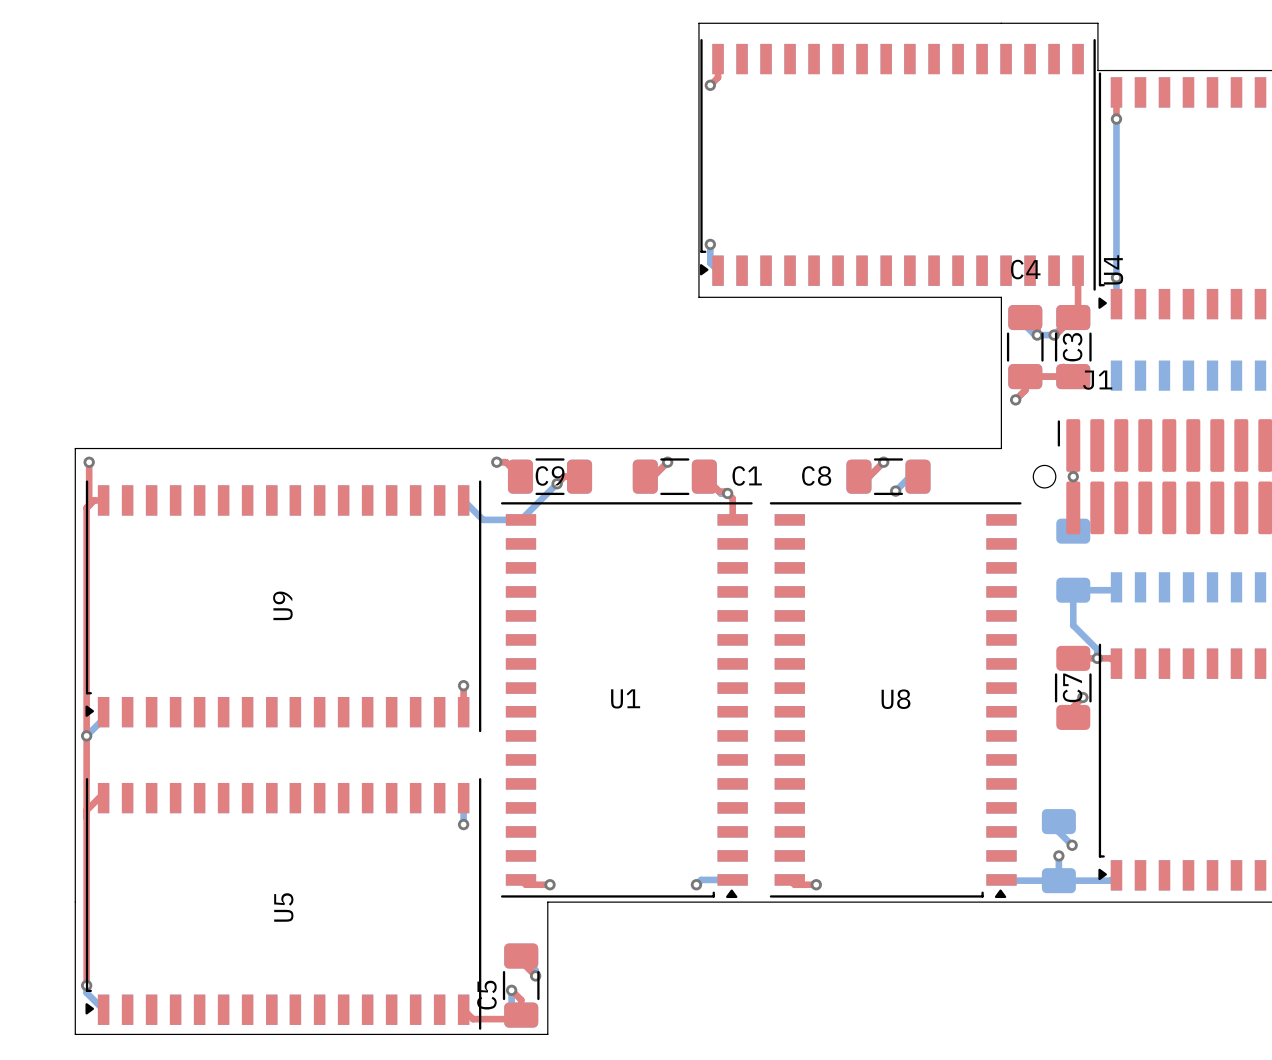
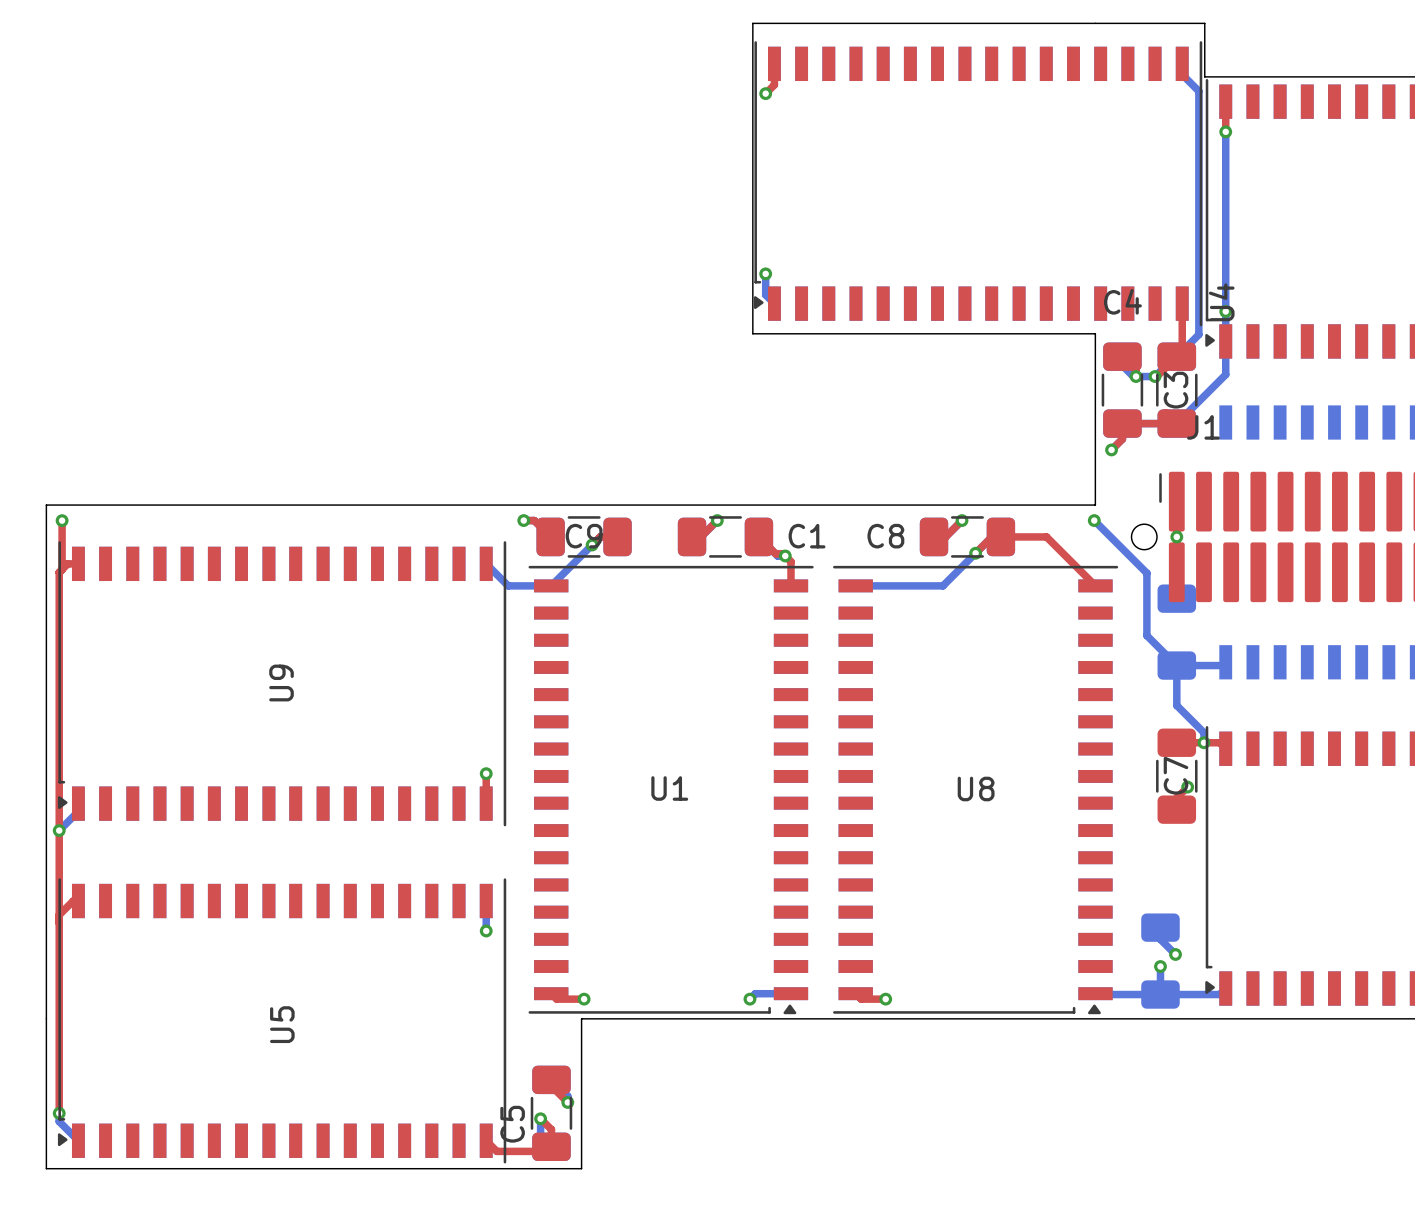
bottom track: none -> (1182, 63) (1182, 74) (1198, 91) (1198, 334) (1176, 356)
bottom track: none -> (1225, 341) (1225, 374) (1176, 423)
bottom track: none -> (1094, 520) (1146, 573) (1146, 635) (1176, 665)
via: none -> (1094, 520)
top track: none -> (975, 553) (991, 536) (1046, 536) (1095, 585)
bottom track: none -> (975, 553) (942, 585) (855, 585)

